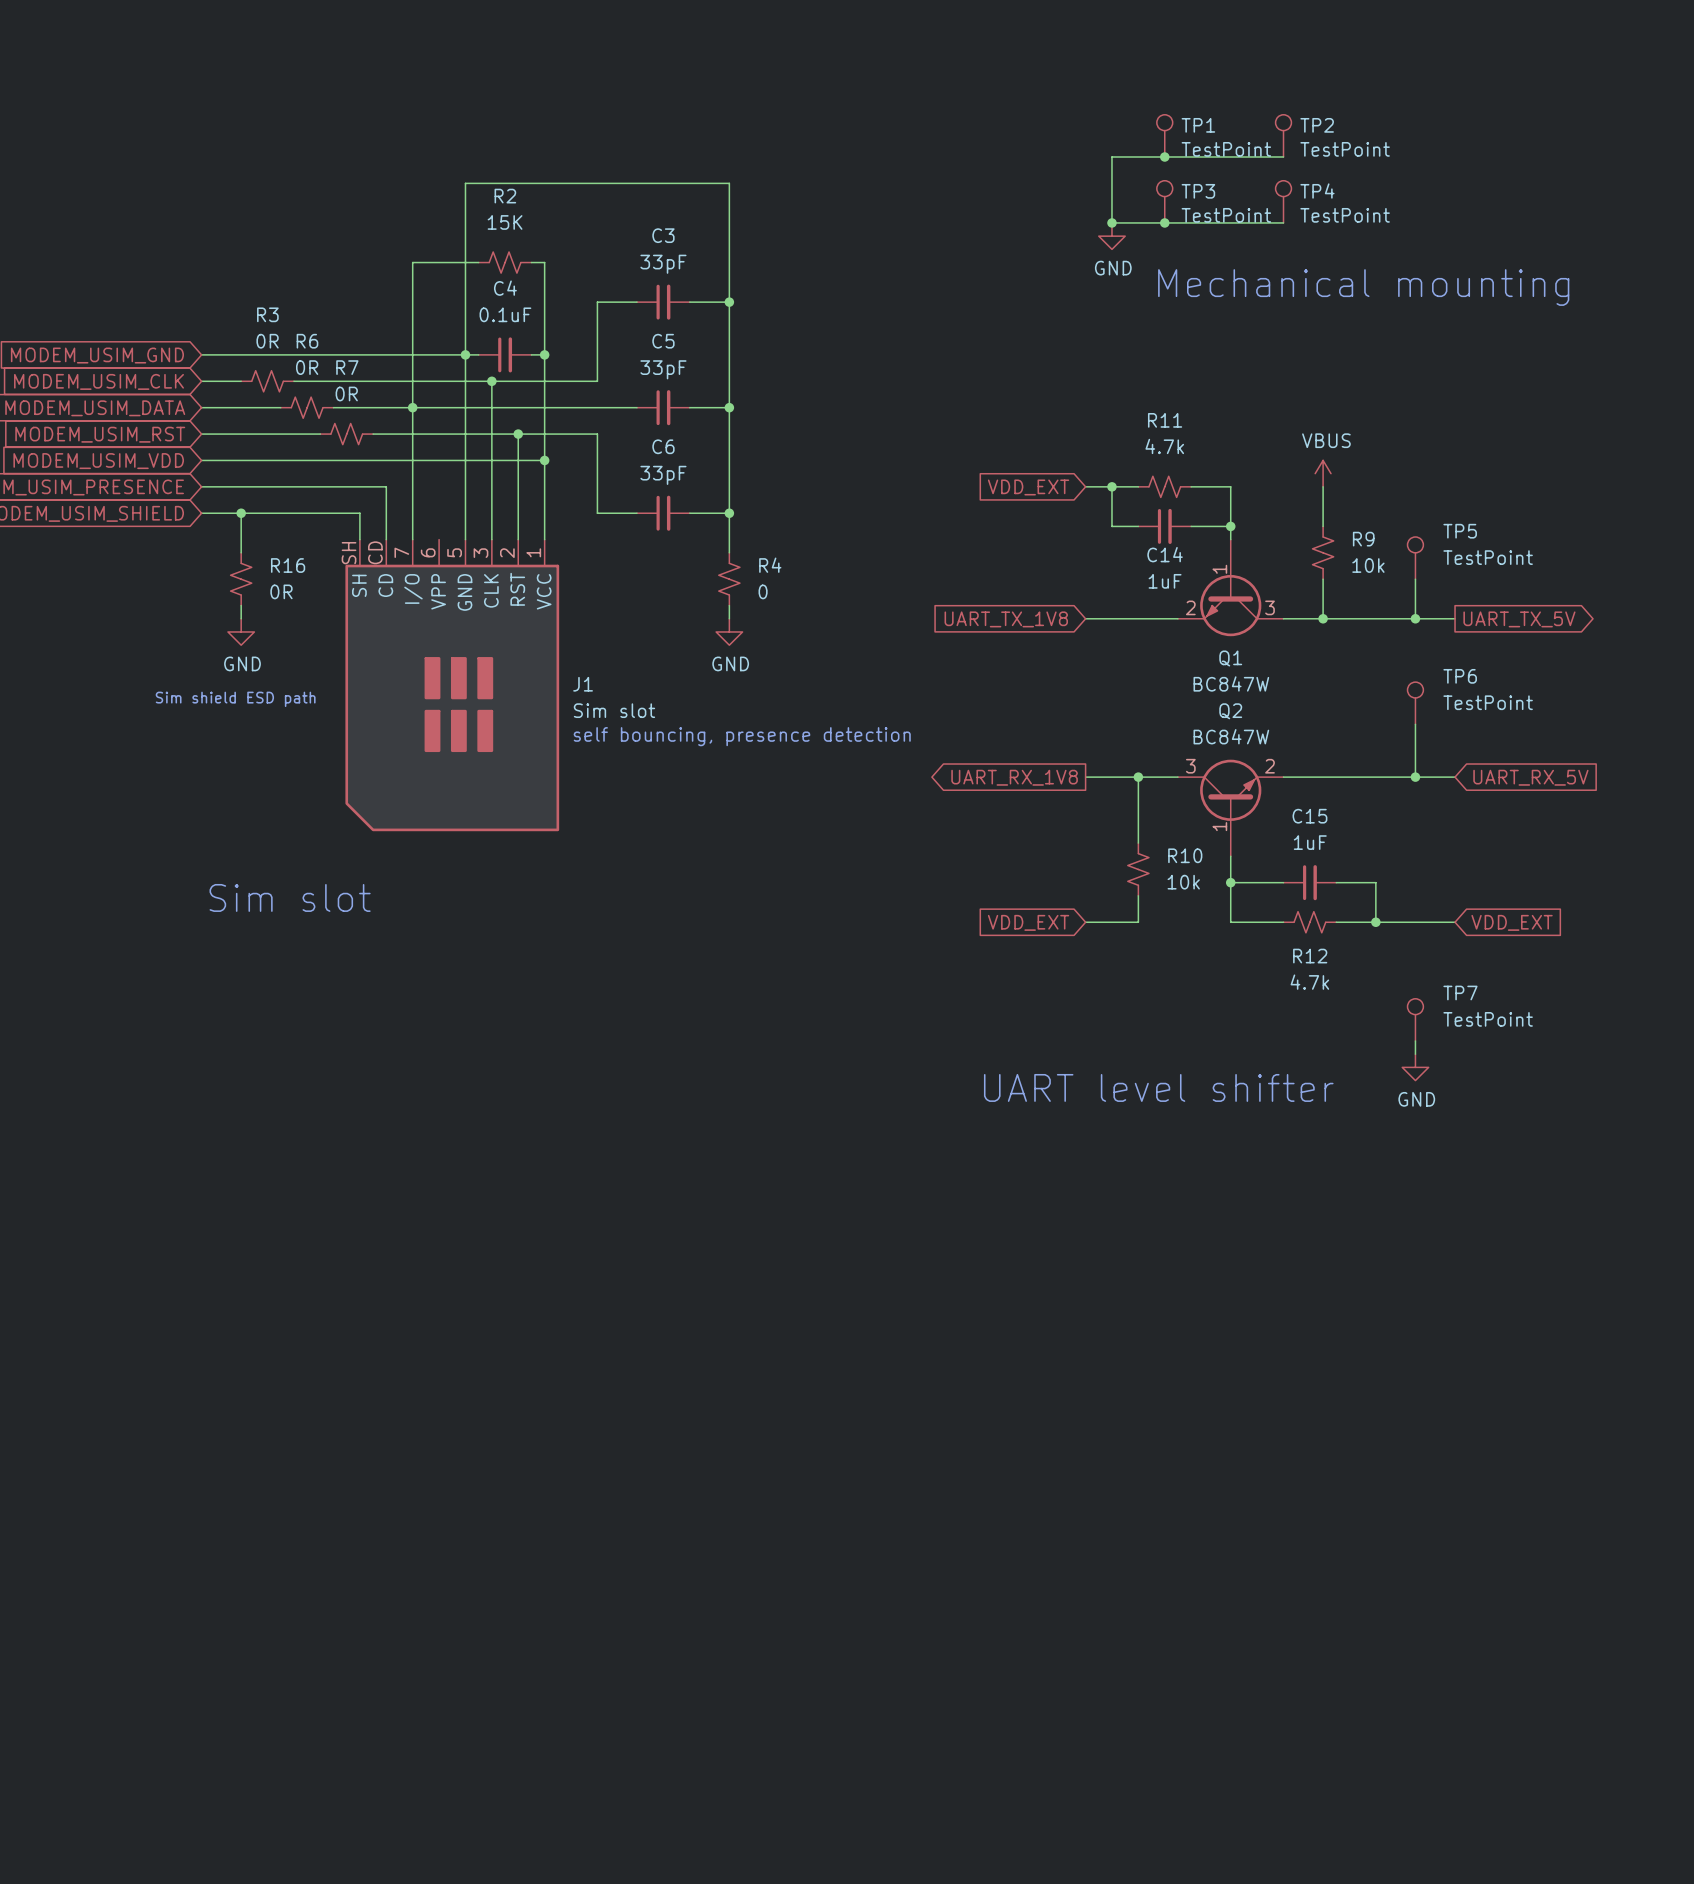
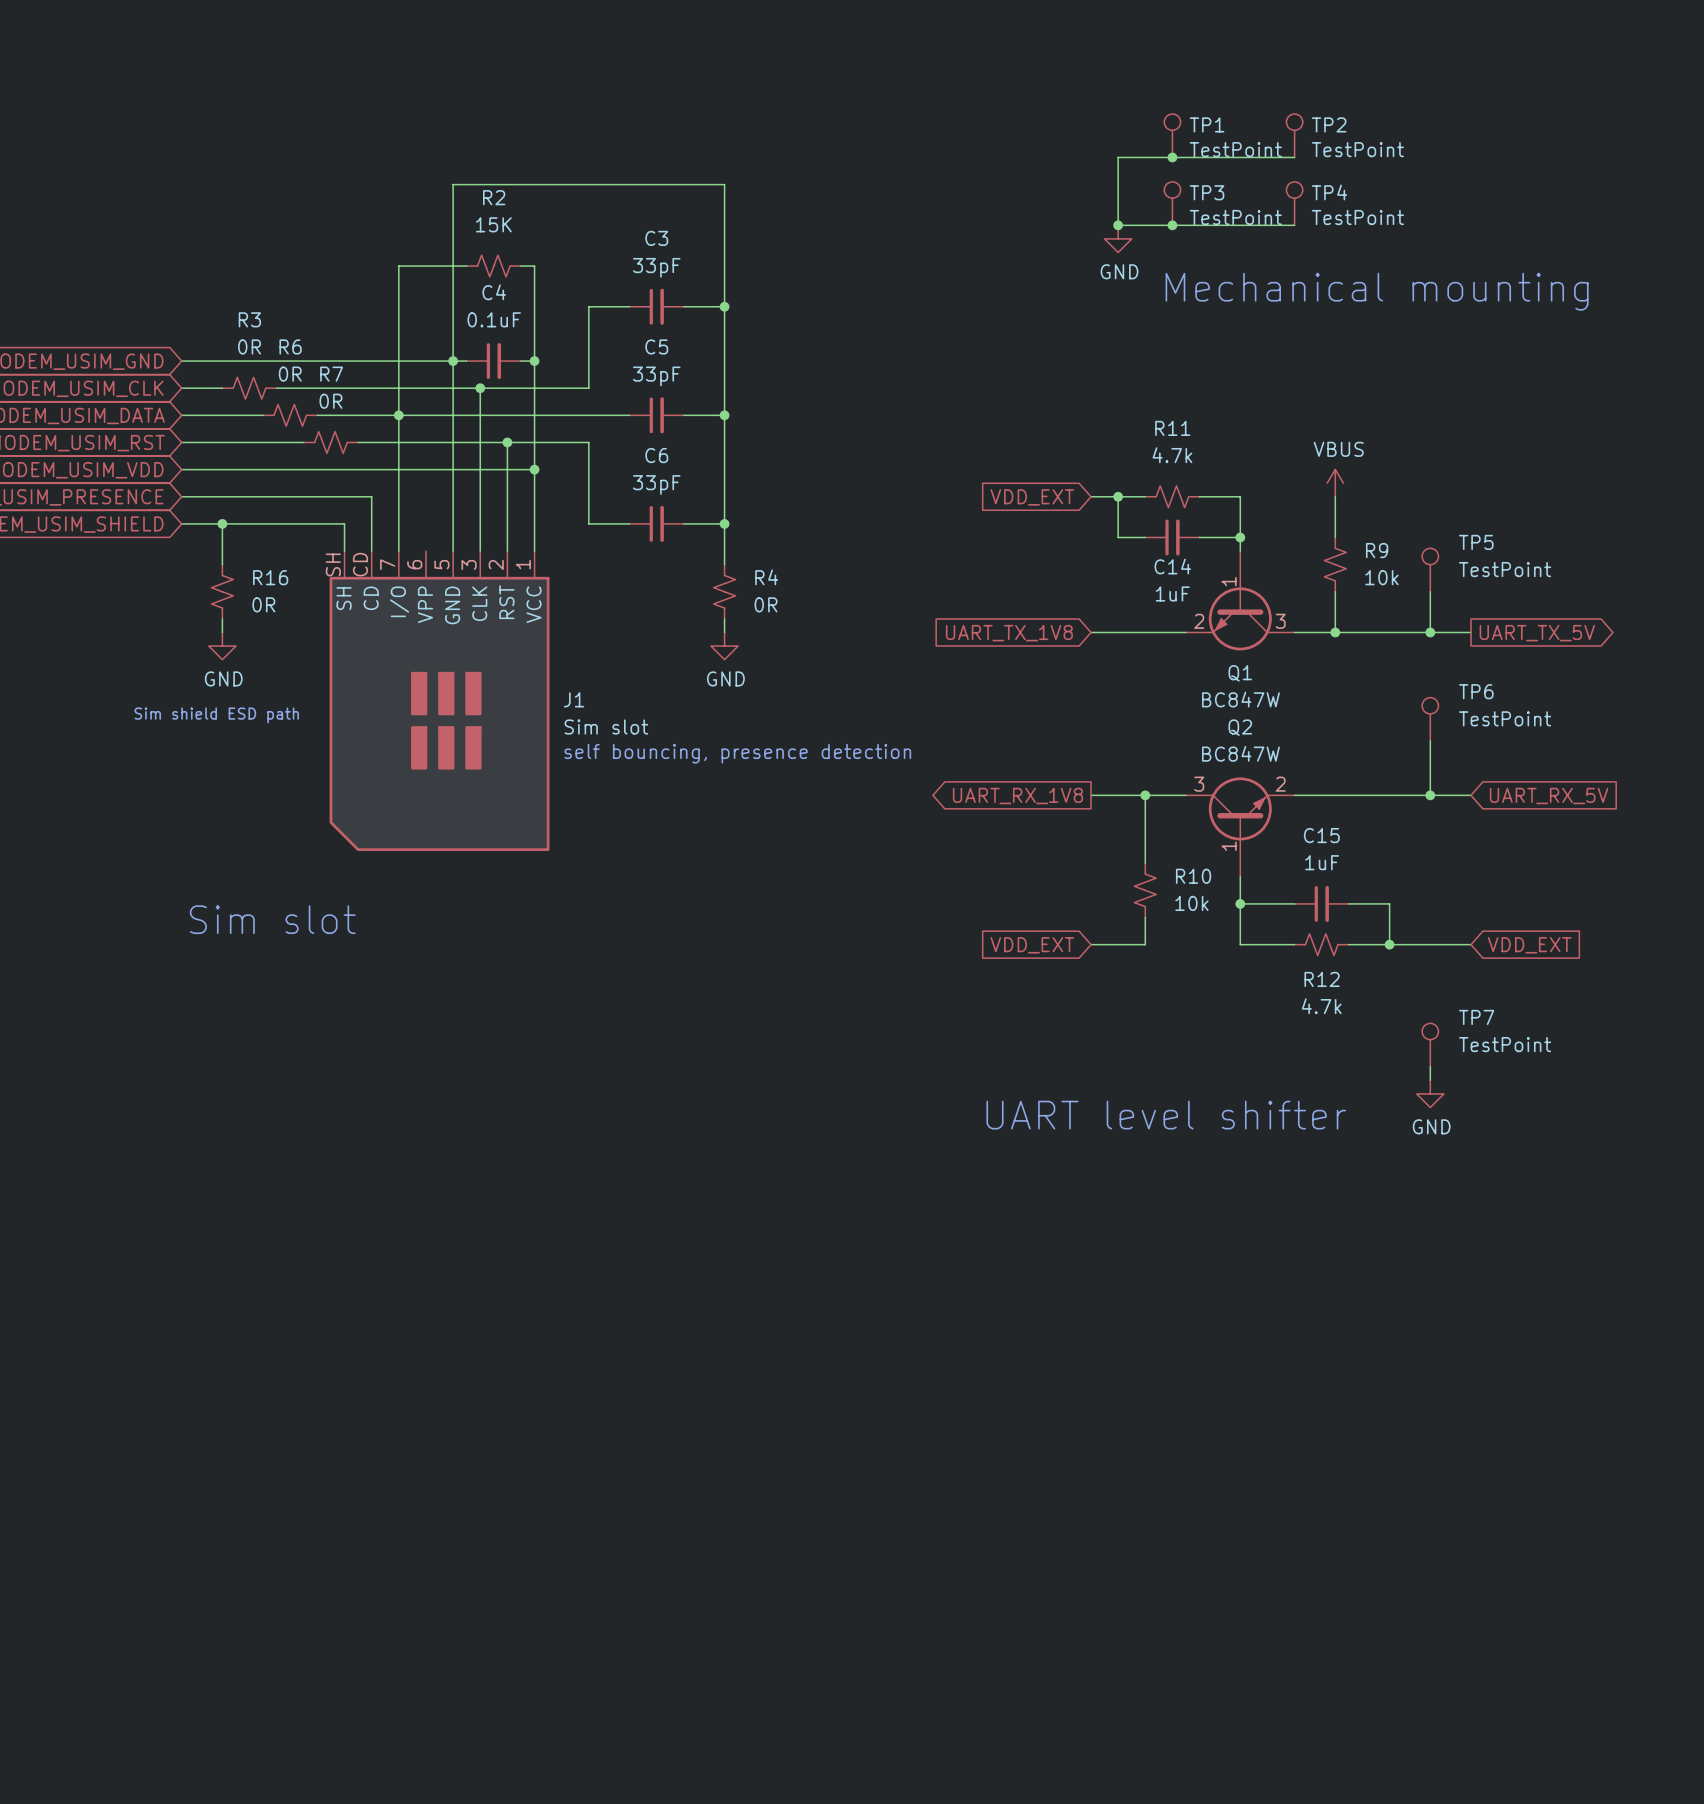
R4 value: 0 (763, 591) -> 0R (766, 604)

